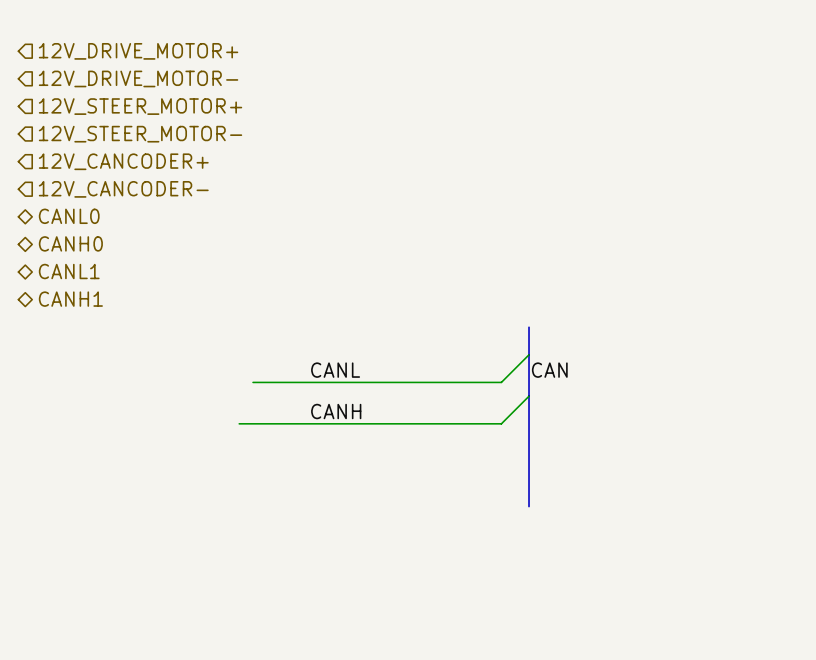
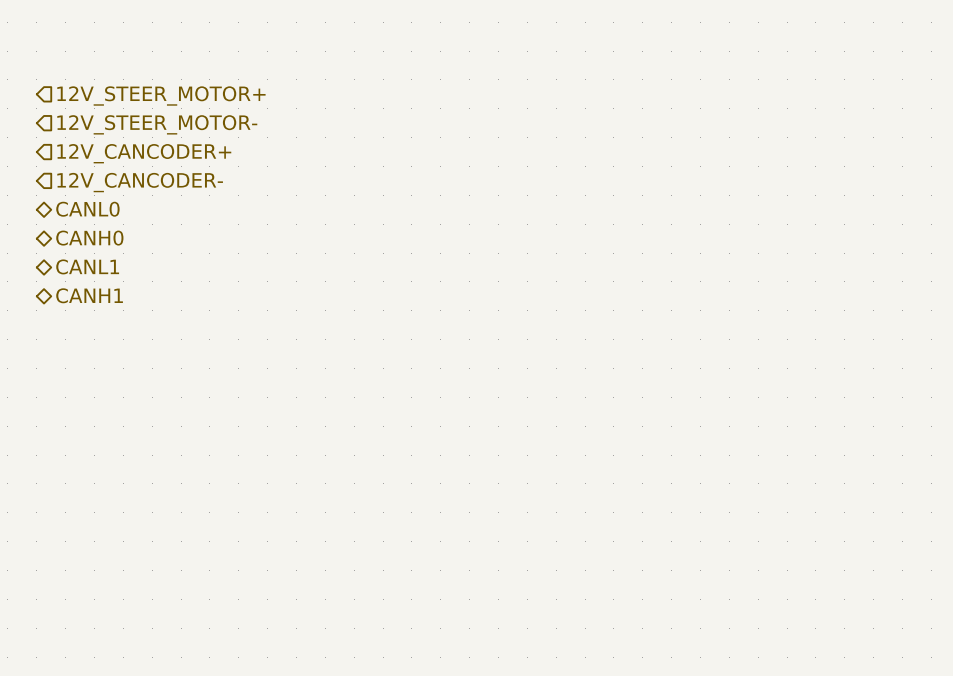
hierarchical label: 12V_DRIVE_MOTOR+ (138, 51) -> none
hierarchical label: 12V_DRIVE_MOTOR- (138, 78) -> none
bus: (529, 327) (529, 506) -> none
wire: (529, 354) (501, 382) (253, 382) -> none
label: CANL (335, 370) -> none
label: CAN (549, 370) -> none
wire: (529, 396) (501, 423) (239, 423) -> none
label: CANH (336, 411) -> none

